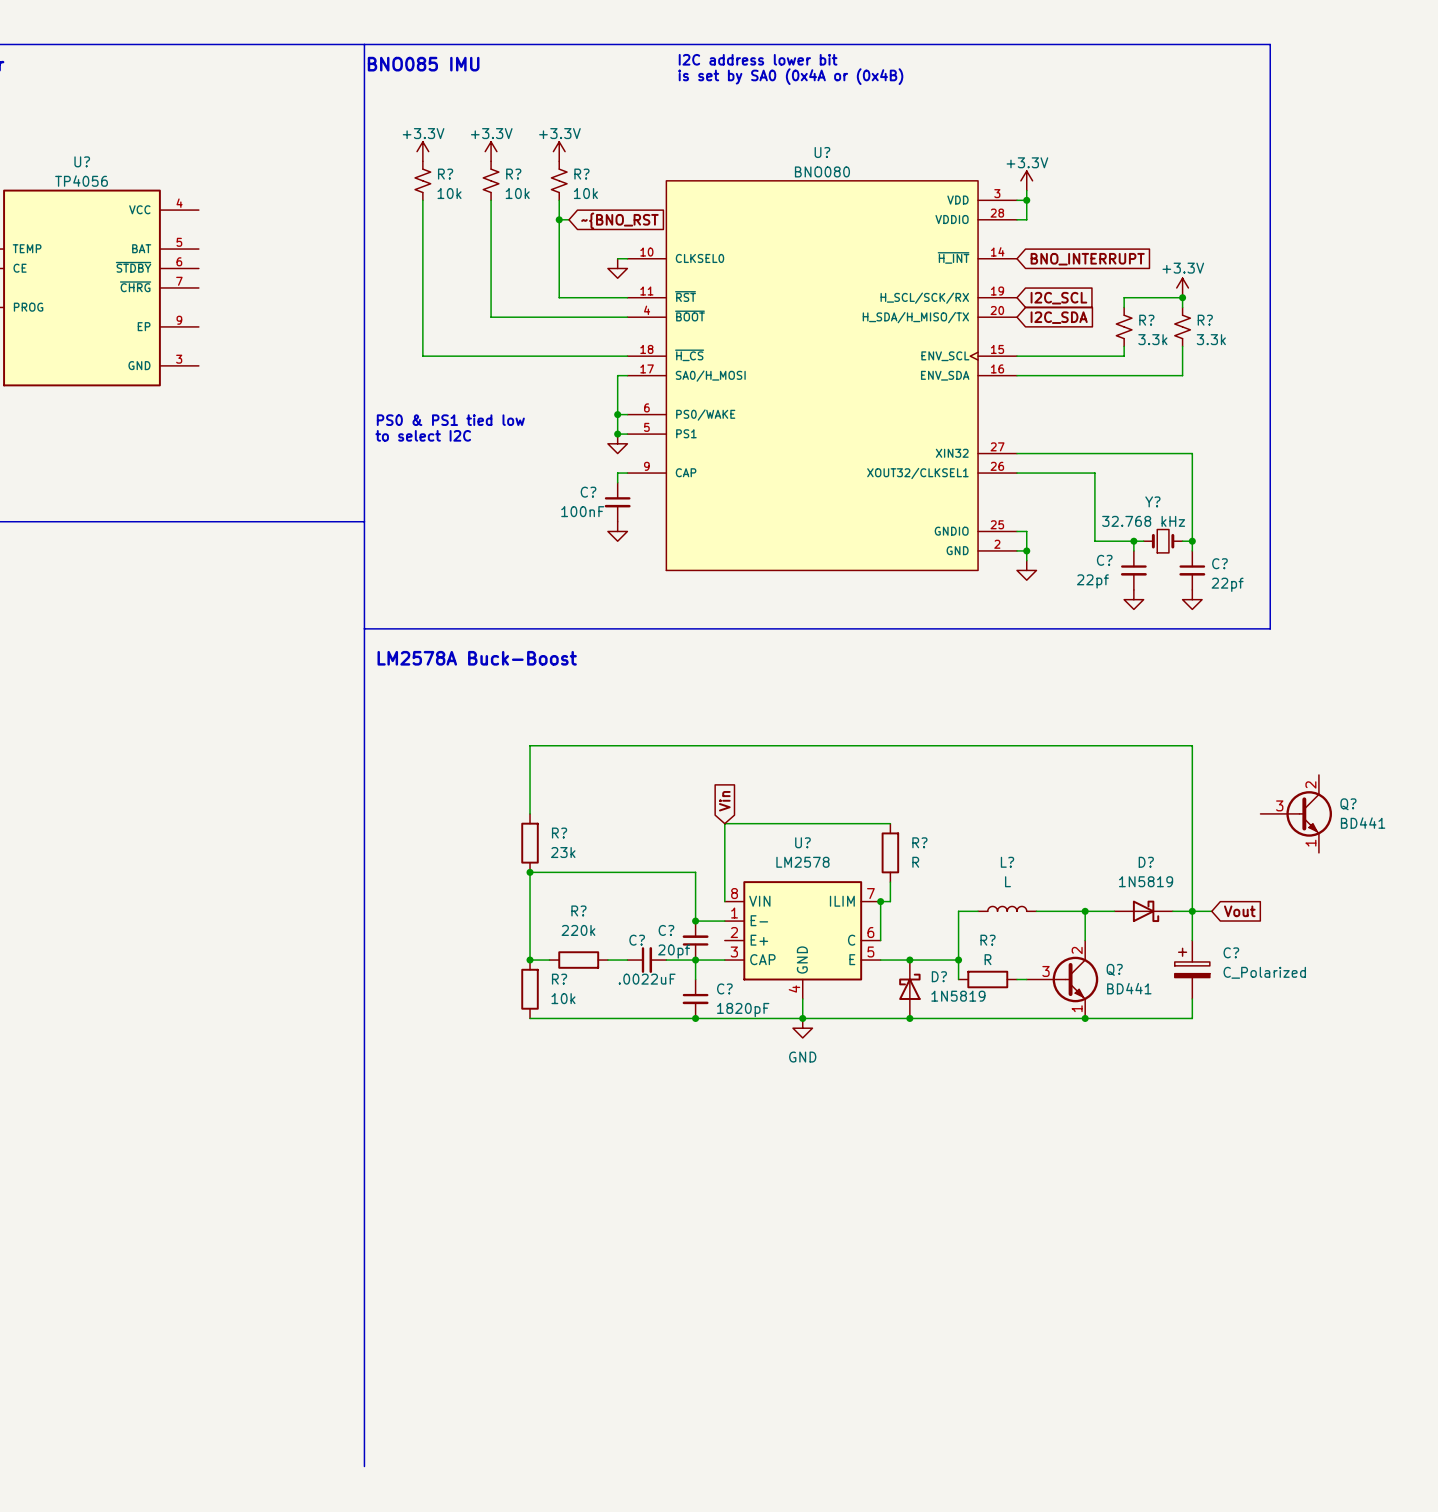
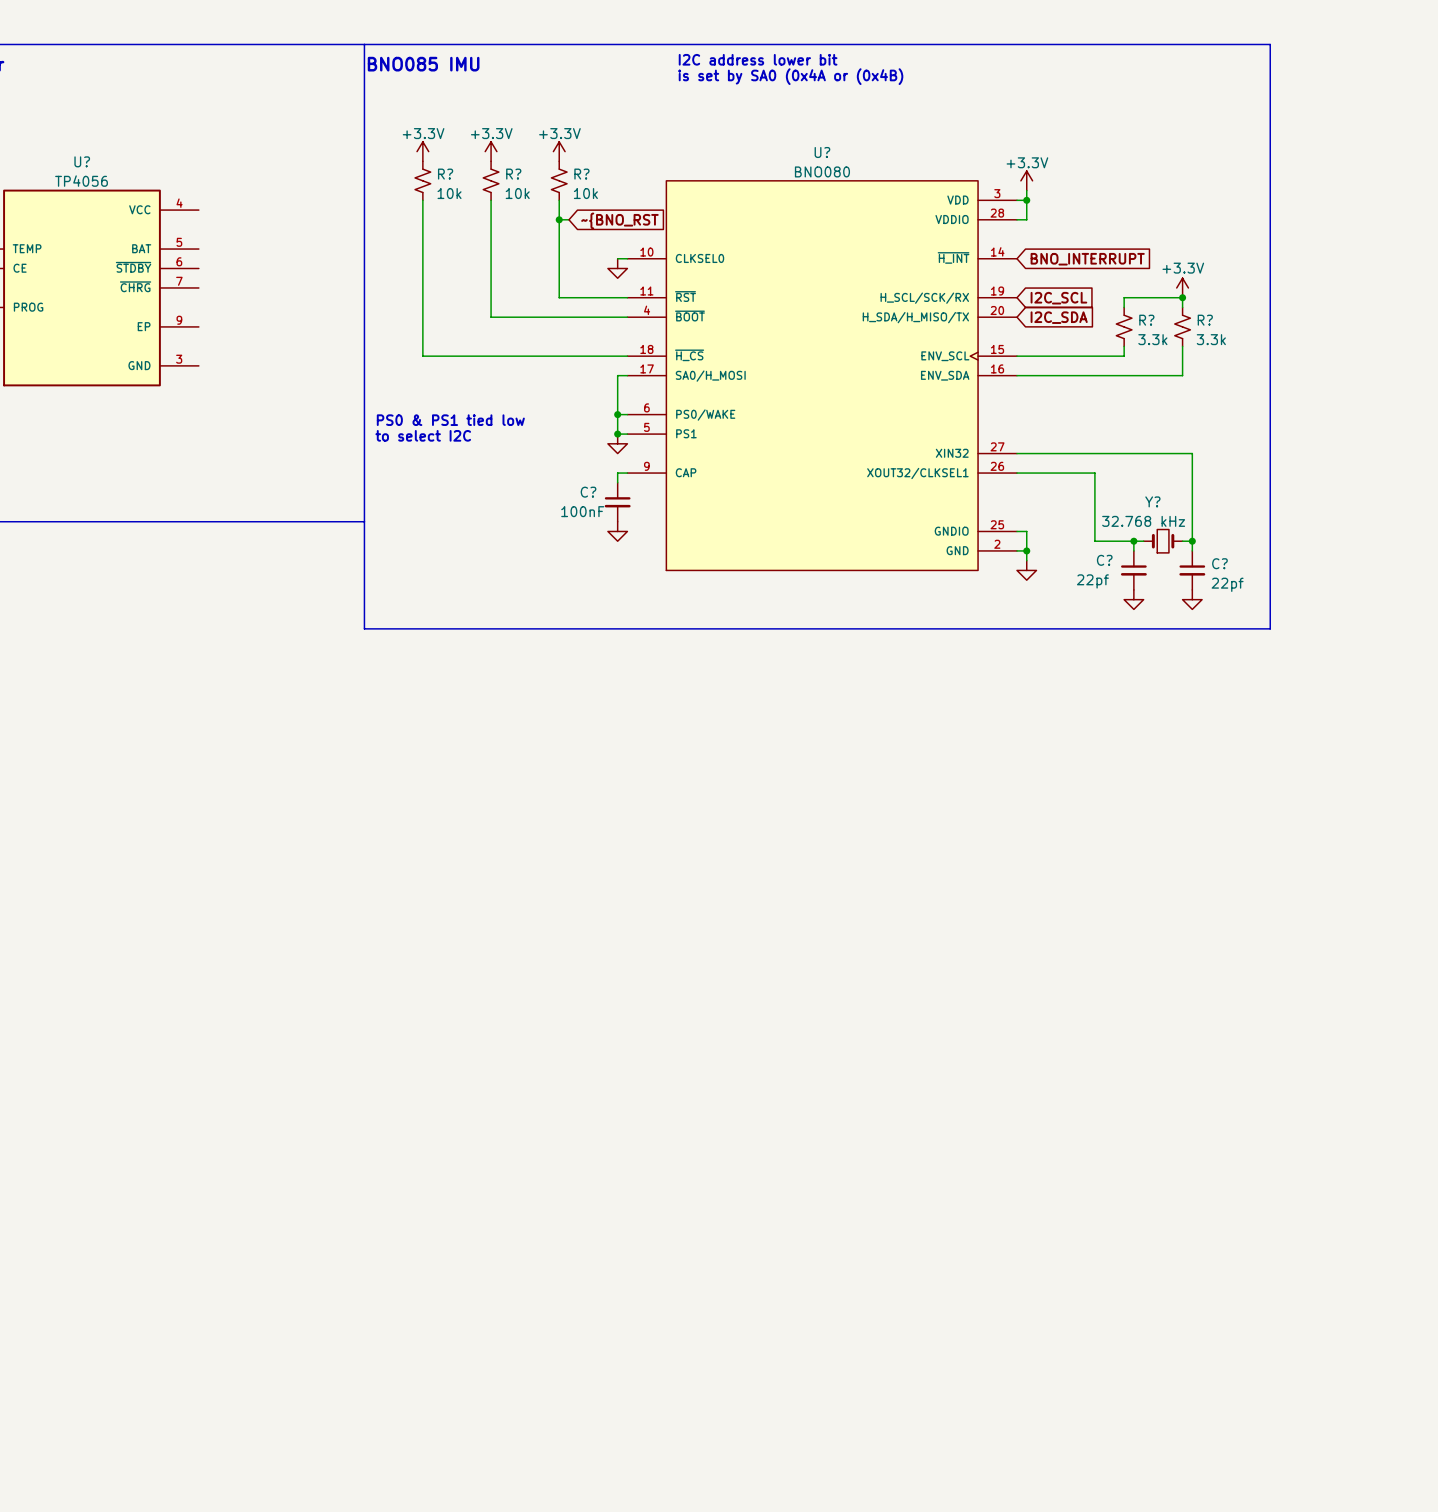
line: (364, 628) (364, 1466) -> none
text: LM2578A Buck-Boost (477, 658) -> none
global label: Vin (724, 801) -> none
wire: (530, 813) (530, 745) (1192, 745) (1192, 940) -> none
Q?: BD441 (1296, 813) -> none
wire: (890, 823) (724, 823) (724, 901) -> none
R?: 23k (530, 843) -> none
R?: R (890, 852) -> none
junction: (530, 872) -> none
wire: (890, 882) (890, 901) (880, 901) (880, 940) -> none
junction: (880, 901) -> none
L?: L (1007, 908) -> none
wire: (978, 911) (958, 911) (958, 979) -> none
wire: (1036, 911) (1114, 911) -> none
wire: (1085, 911) (1085, 940) -> none
junction: (1085, 911) -> none
D?: 1N5819 (1143, 911) -> none
wire: (1172, 911) (1211, 911) -> none
junction: (1192, 911) -> none
global label: Vout (1239, 911) -> none
junction: (695, 921) -> none
wire: (724, 921) (695, 921) (695, 872) (530, 872) (530, 960) (549, 960) -> none
C?: 20pf (695, 940) -> none
U?: LM2578 (802, 940) -> none
junction: (530, 960) -> none
R?: 220k (578, 960) -> none
wire: (607, 960) (627, 960) -> none
C?: .0022uF (646, 960) -> none
wire: (666, 960) (724, 960) -> none
wire: (695, 960) (695, 979) -> none
junction: (695, 960) -> none
wire: (880, 960) (958, 960) -> none
junction: (909, 960) -> none
junction: (958, 960) -> none
C?: C_Polarized (1192, 969) -> none
R?: R (987, 979) -> none
wire: (1017, 979) (1026, 979) -> none
Q?: BD441 (1062, 979) -> none
R?: 10k (530, 989) -> none
D?: 1N5819 (909, 989) -> none
C?: 1820pF (695, 998) -> none
wire: (802, 998) (802, 1018) -> none
wire: (1192, 998) (1192, 1018) (530, 1018) -> none
junction: (695, 1018) -> none
junction: (802, 1018) -> none
junction: (909, 1018) -> none
junction: (1085, 1018) -> none
power symbol: GND (802, 1028) -> none

